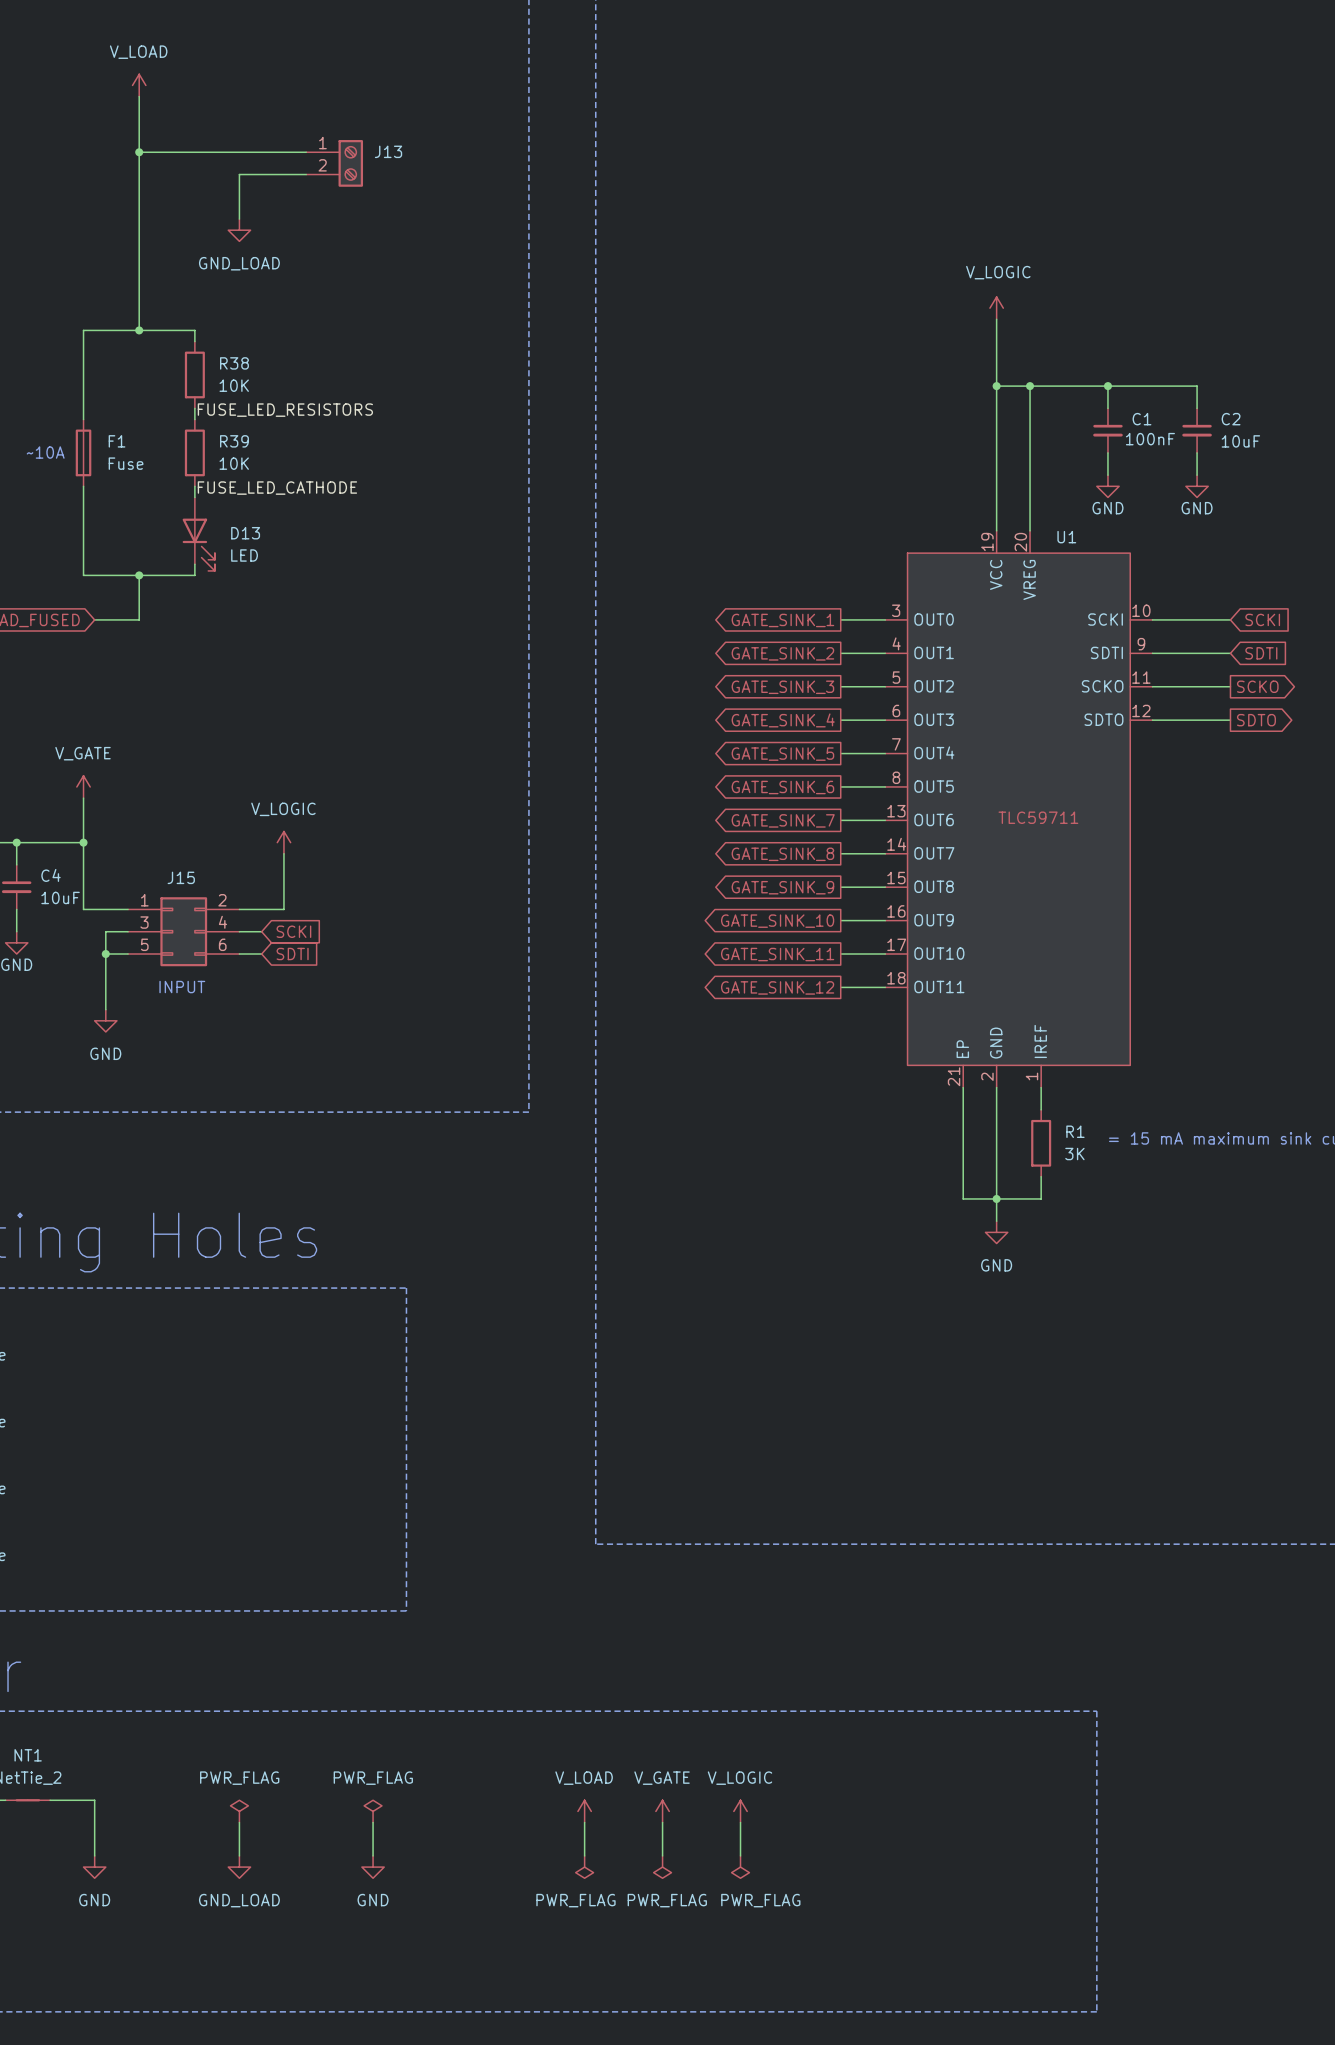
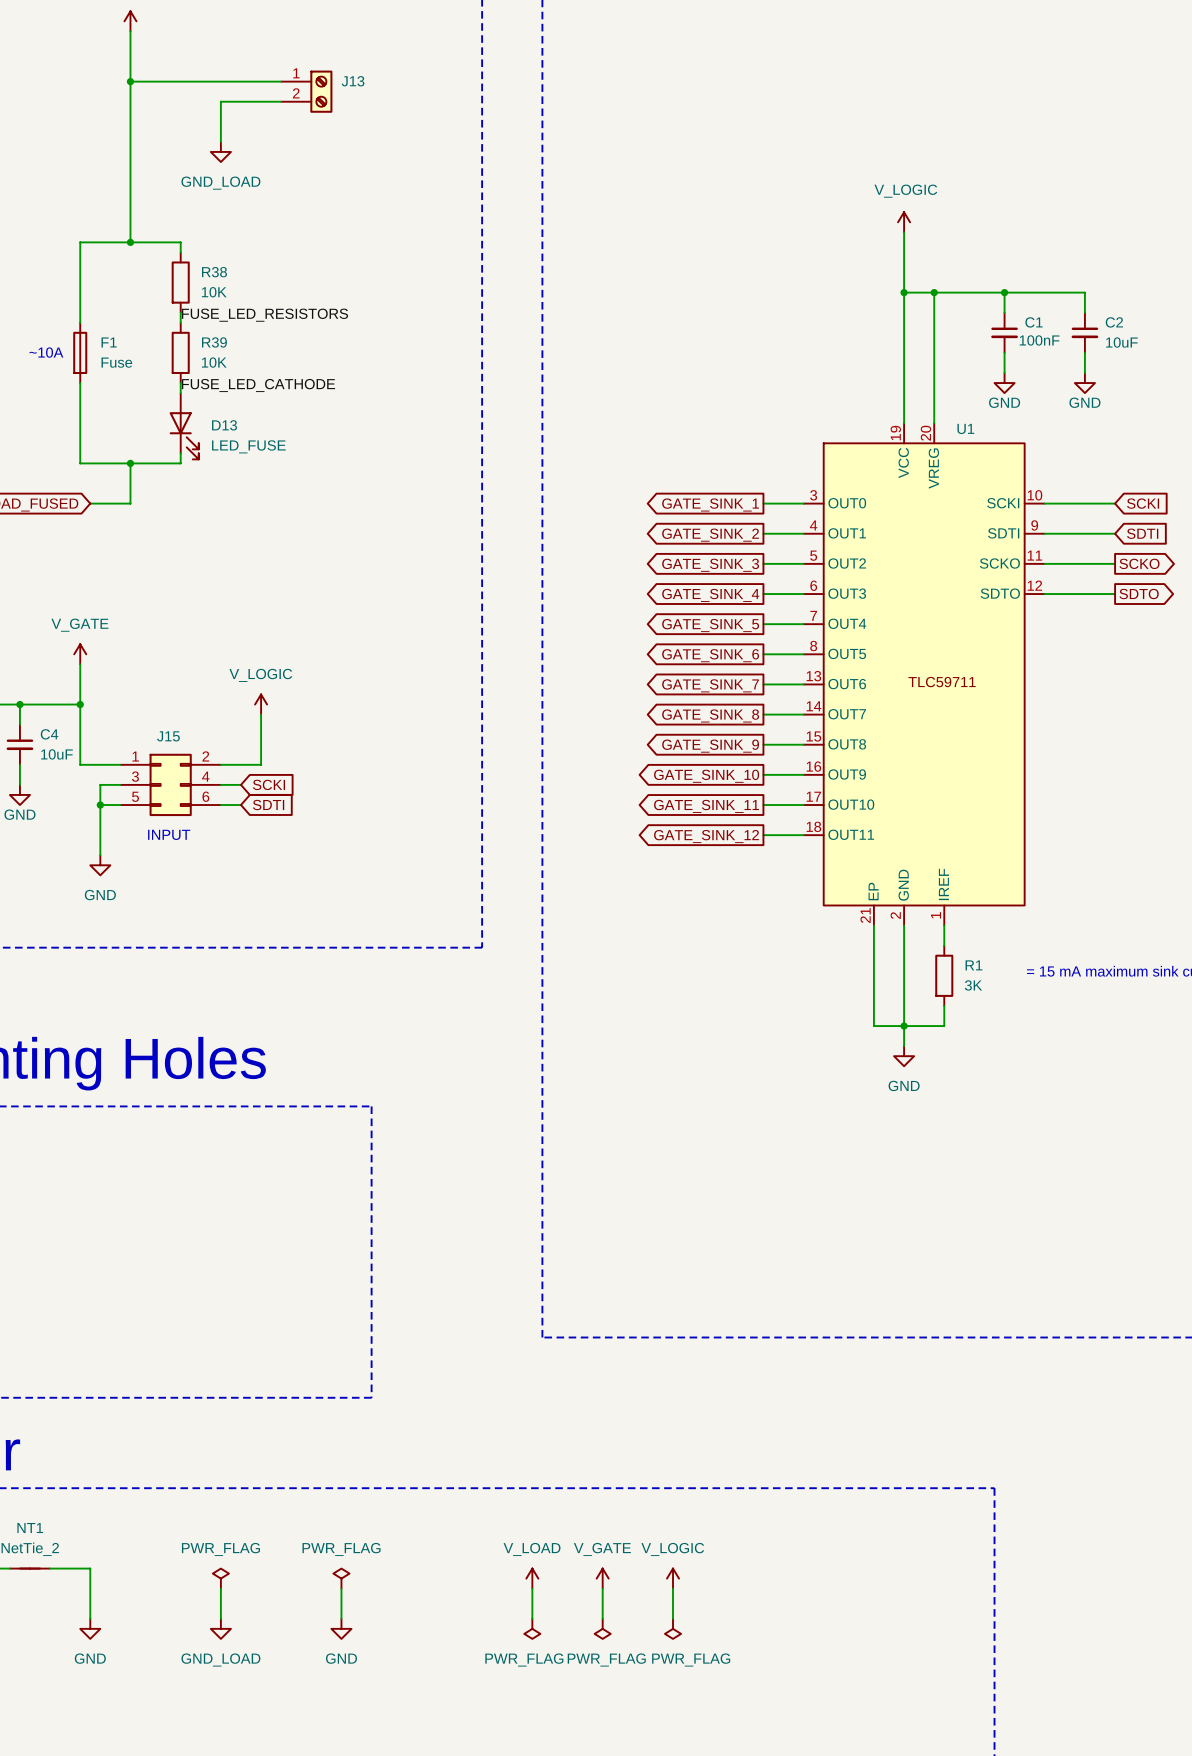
D13 value: LED (244, 555) -> LED_FUSE (248, 446)

